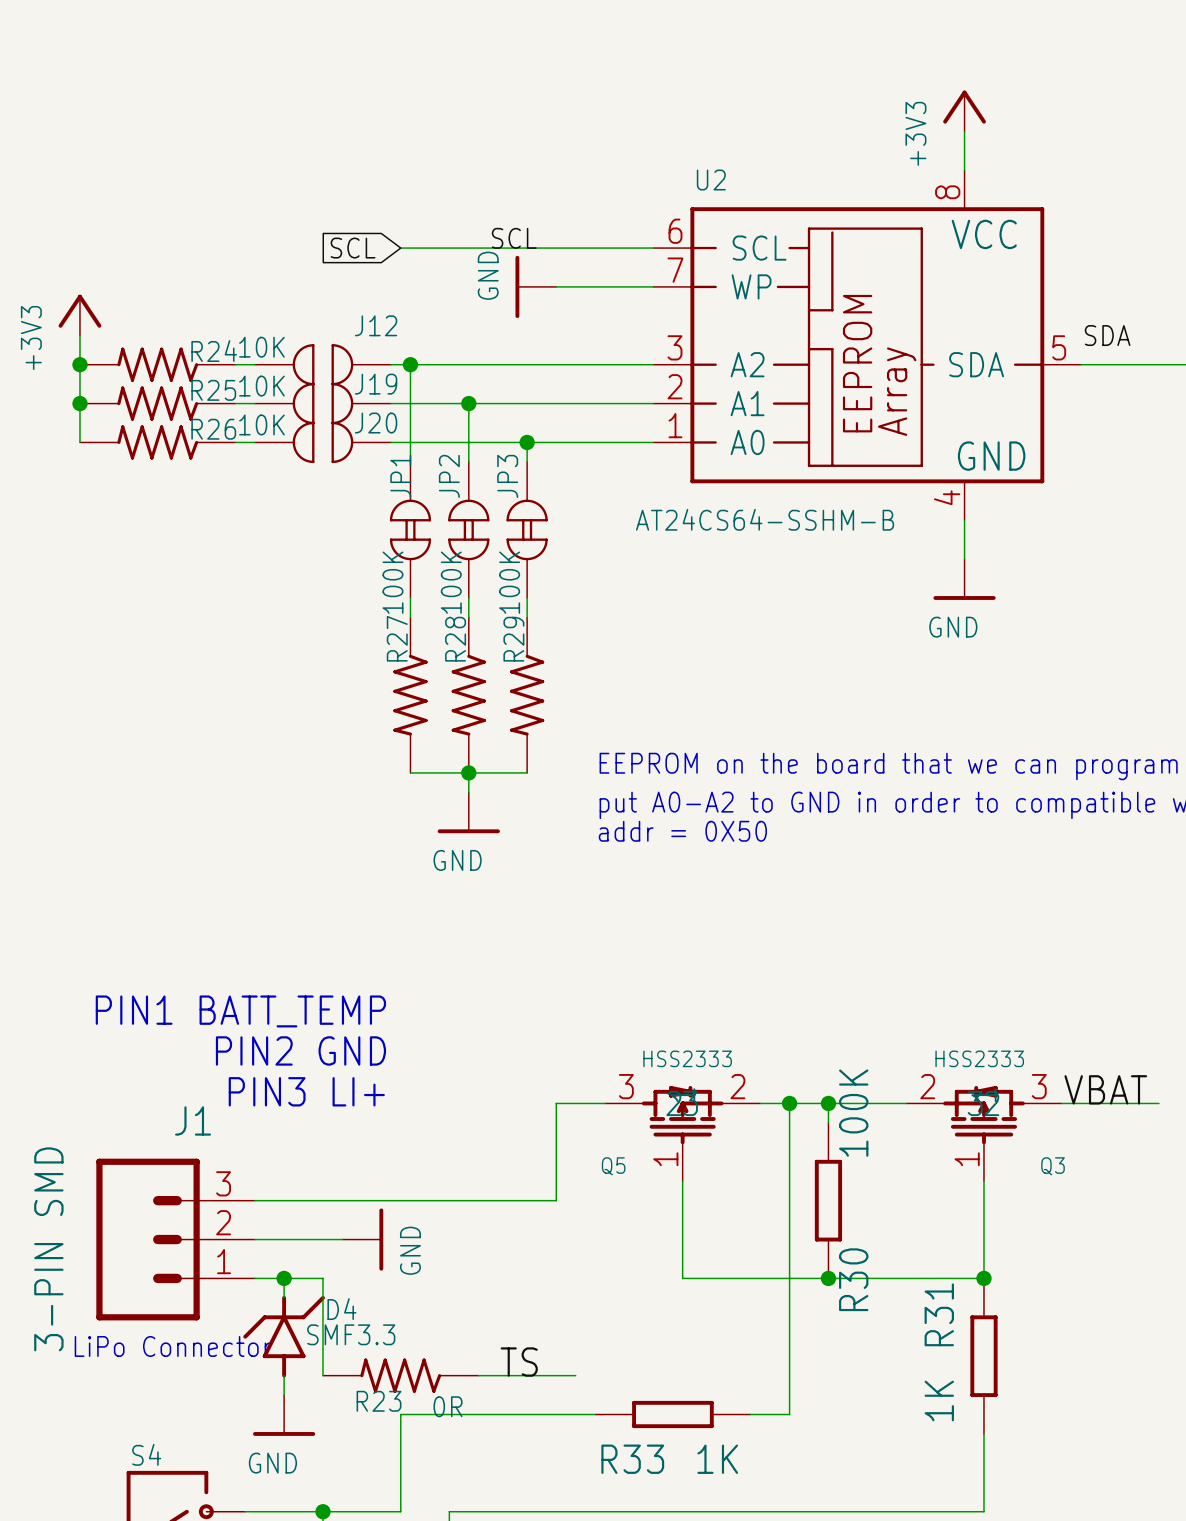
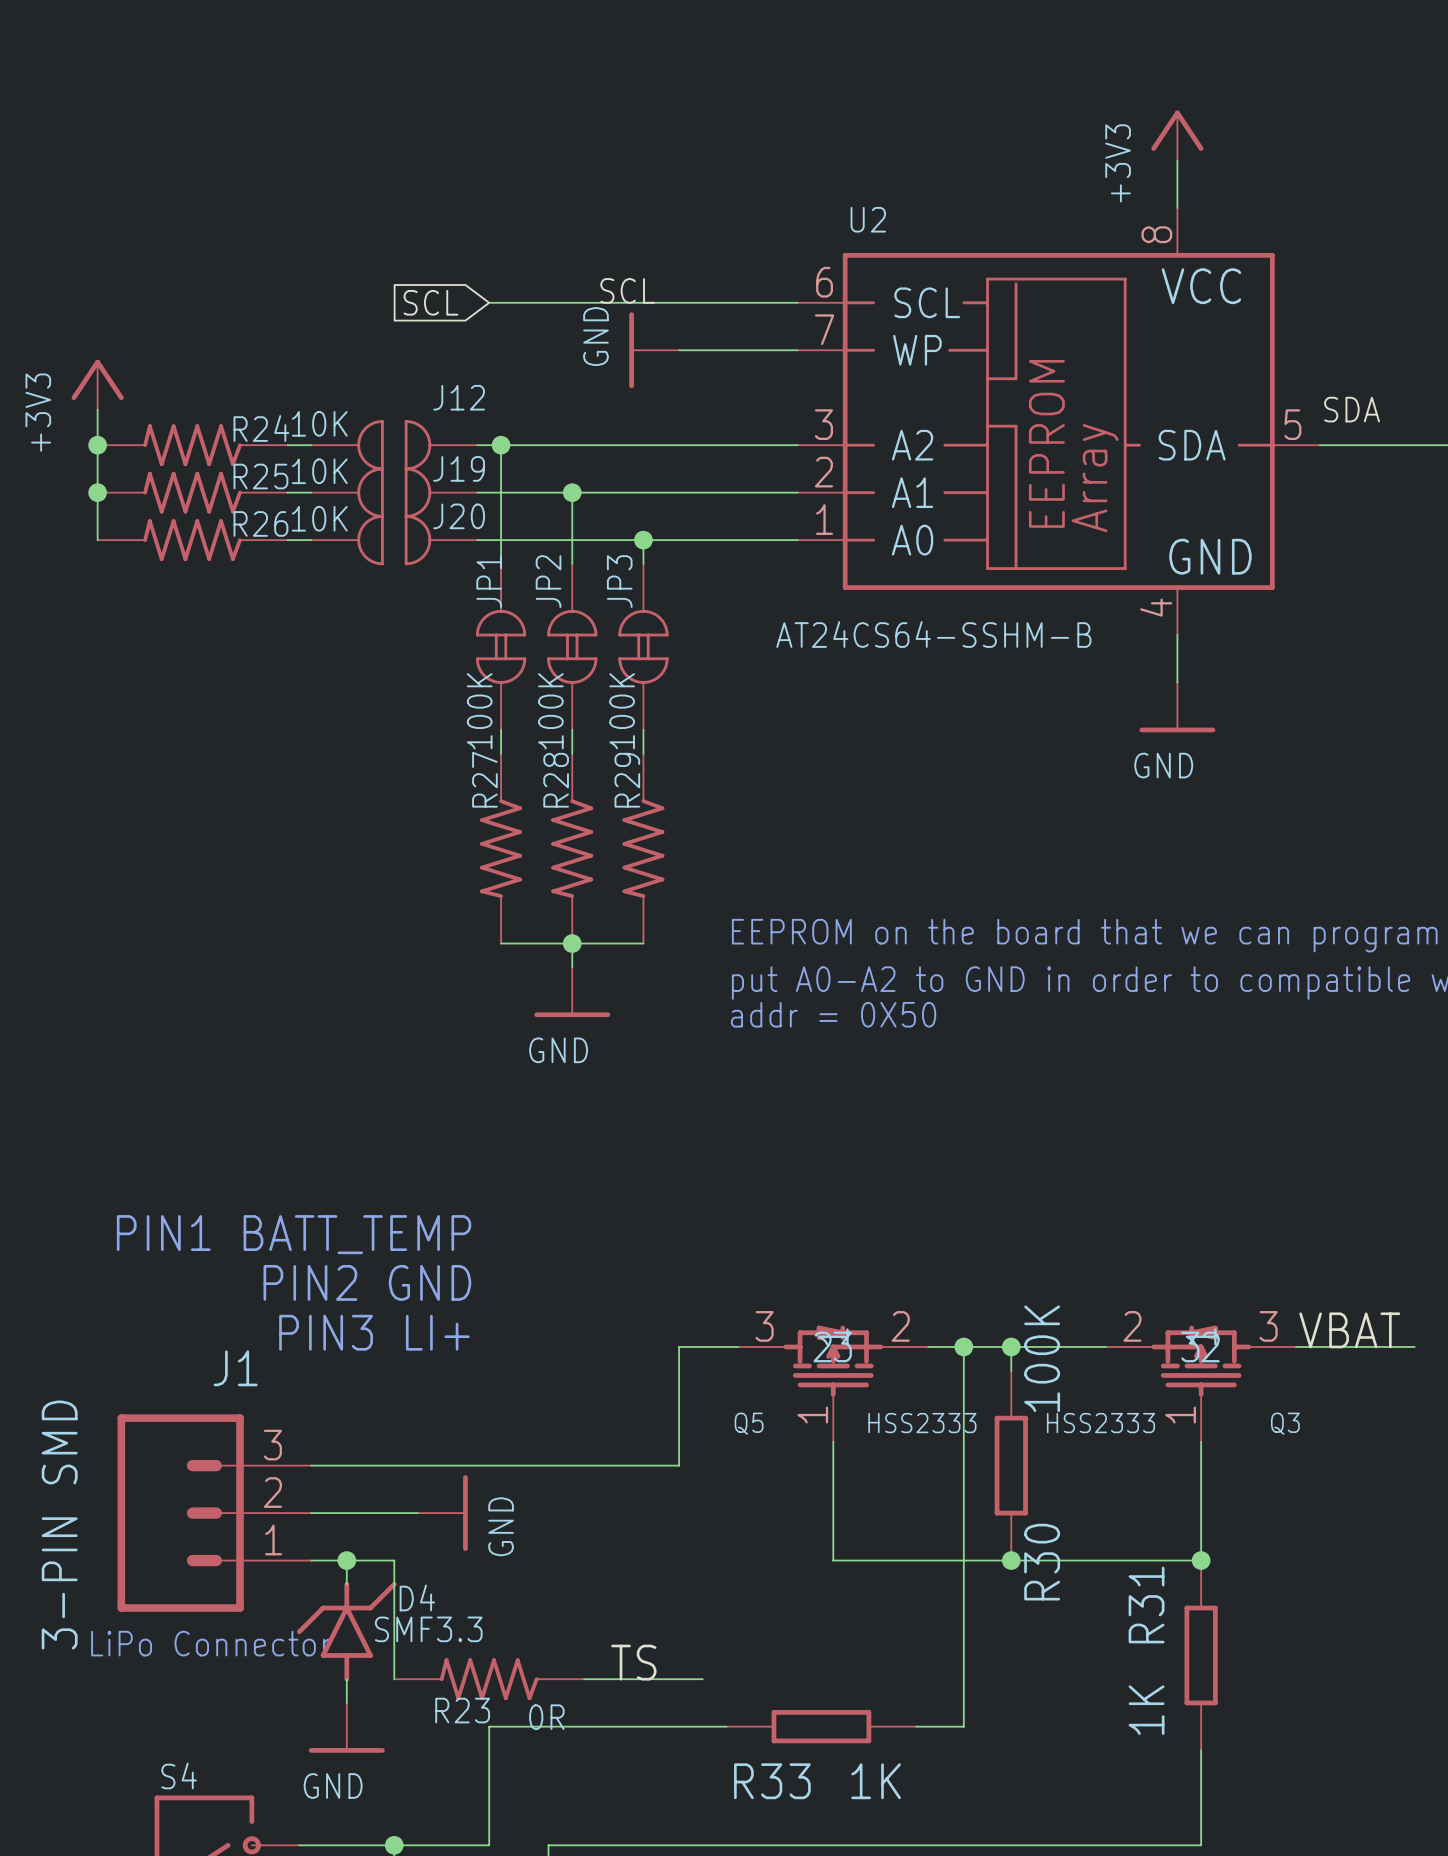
Q5 value position: HSS2333 (687, 1058) -> HSS2333 (922, 1423)
Q3 value position: HSS2333 (979, 1058) -> HSS2333 (1100, 1423)

